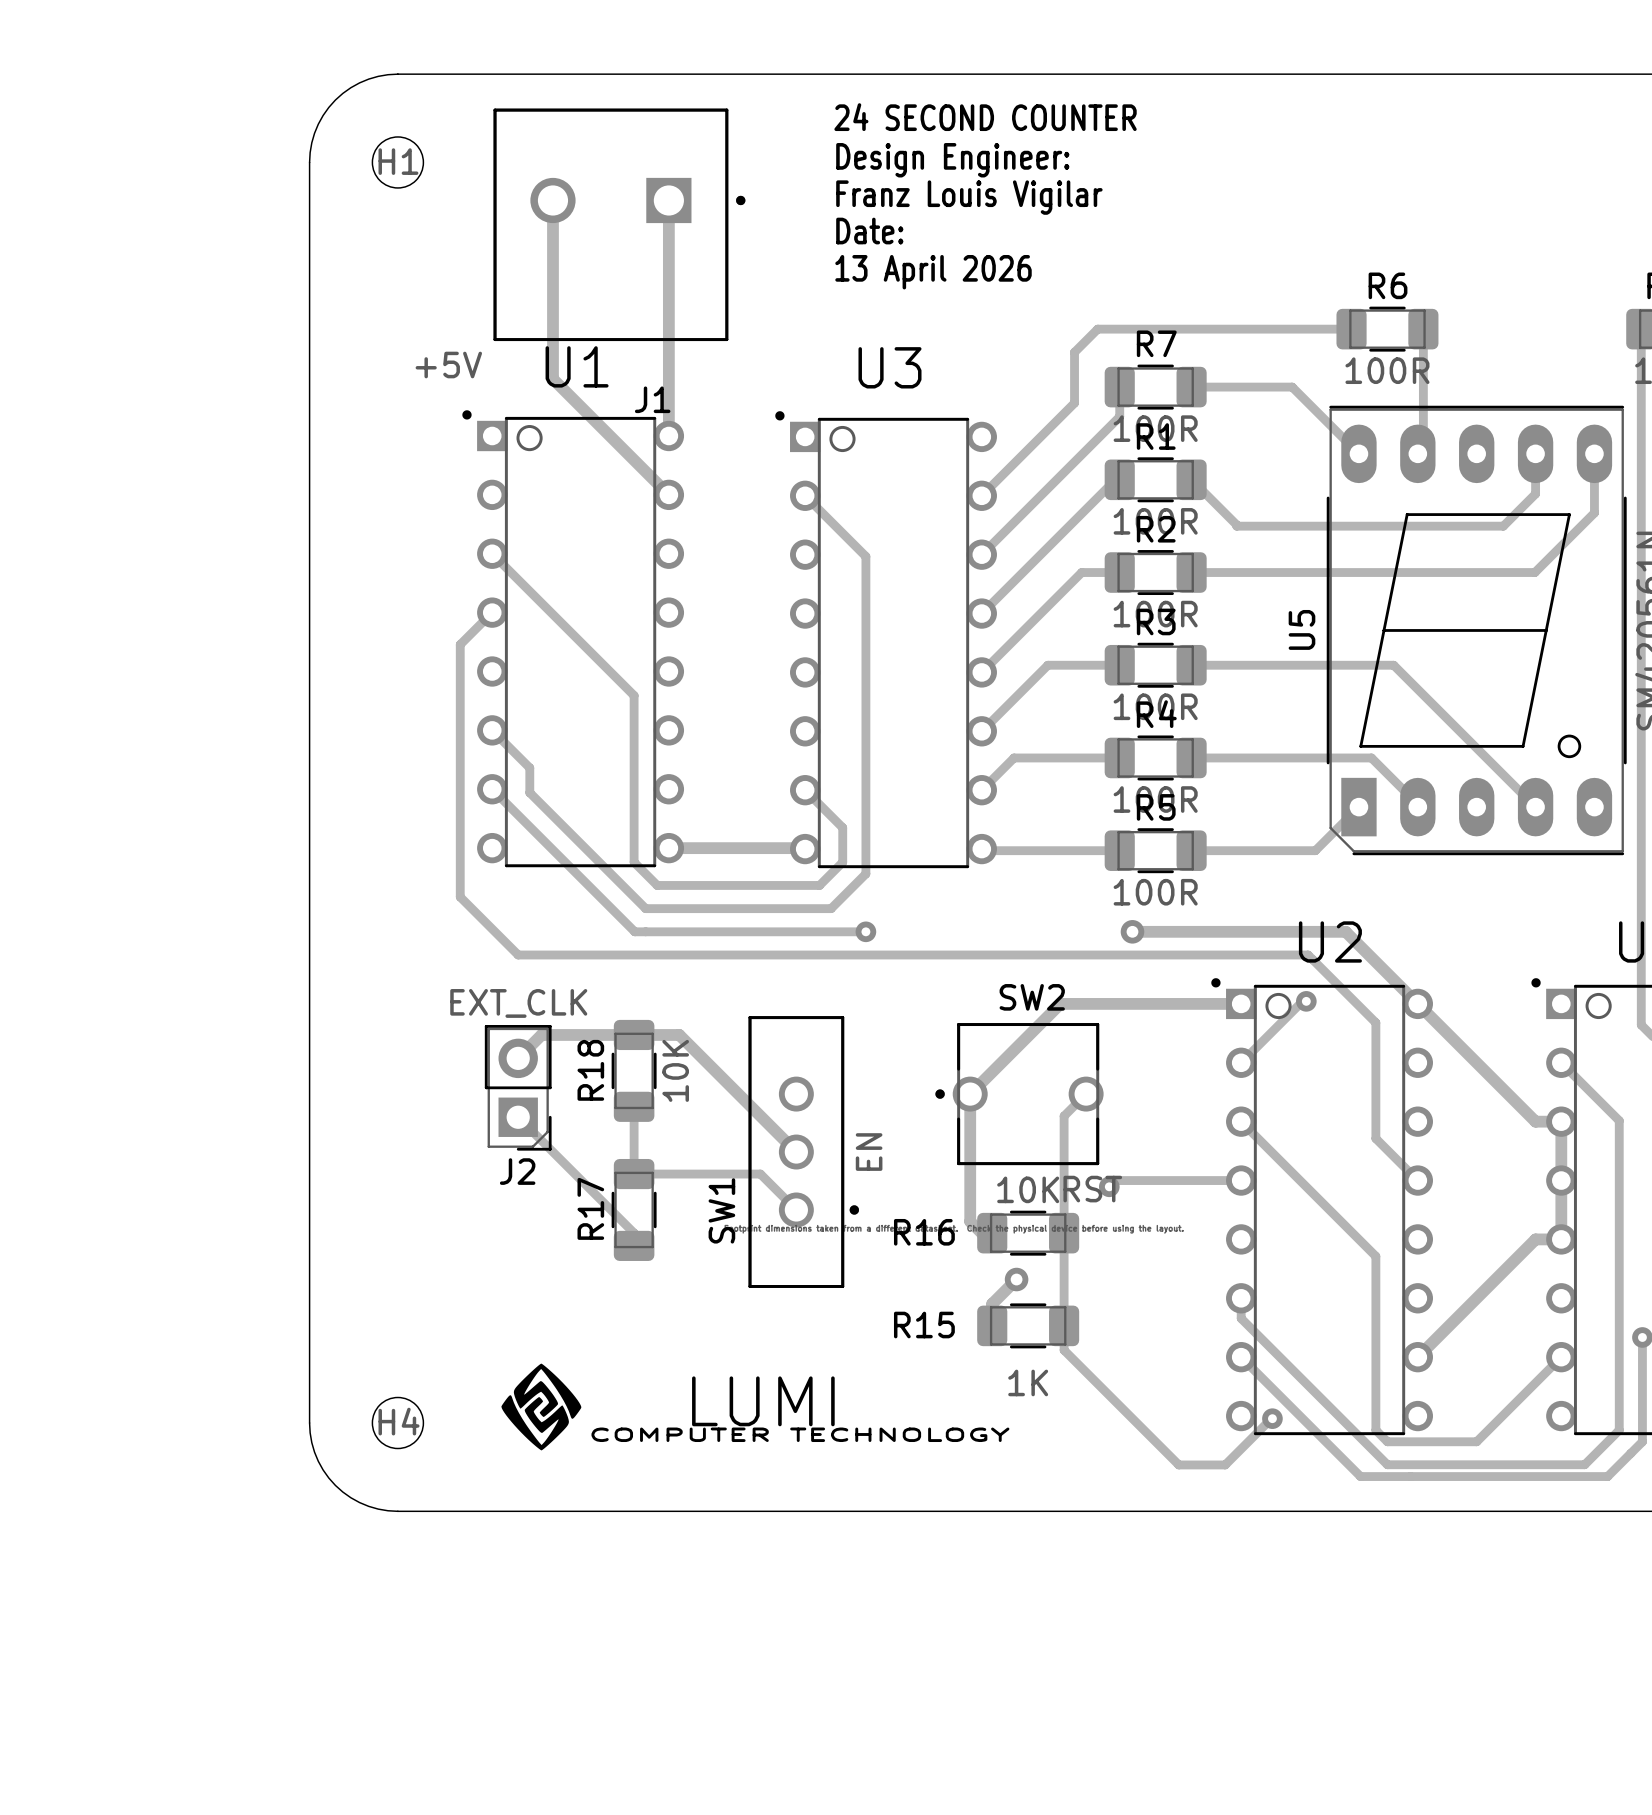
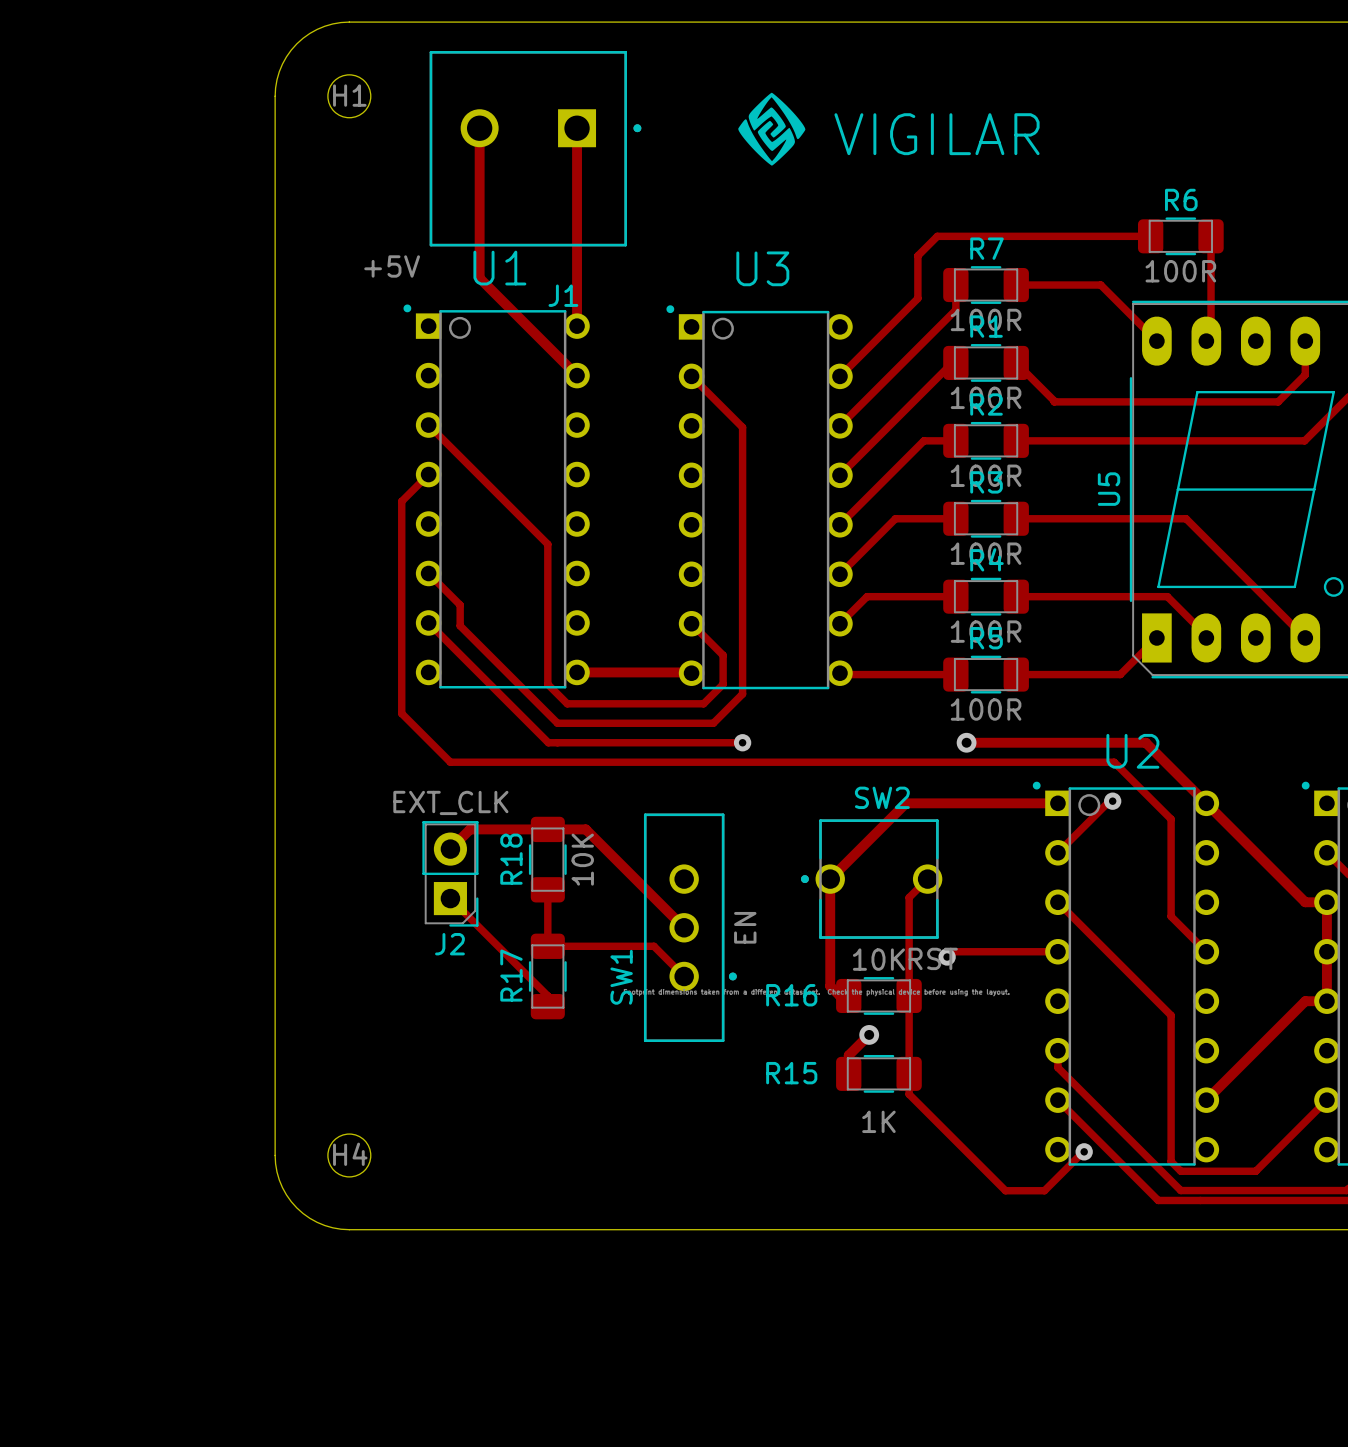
text: 24 SECOND COUNTER (985, 117) -> none
drawing: none -> [738, 92, 806, 166]
text: Design Engineer: (952, 160) -> none
text: Franz Louis Vigilar (969, 197) -> none
text: none -> VIGILAR (937, 134)
text: Date: (869, 231) -> none
text: 13 April 2026 (933, 272) -> none
drawing: [501, 1363, 582, 1451] -> none
text: LUMI (763, 1401) -> none
text: COMPUTER TECHNOLOGY (800, 1434) -> none

